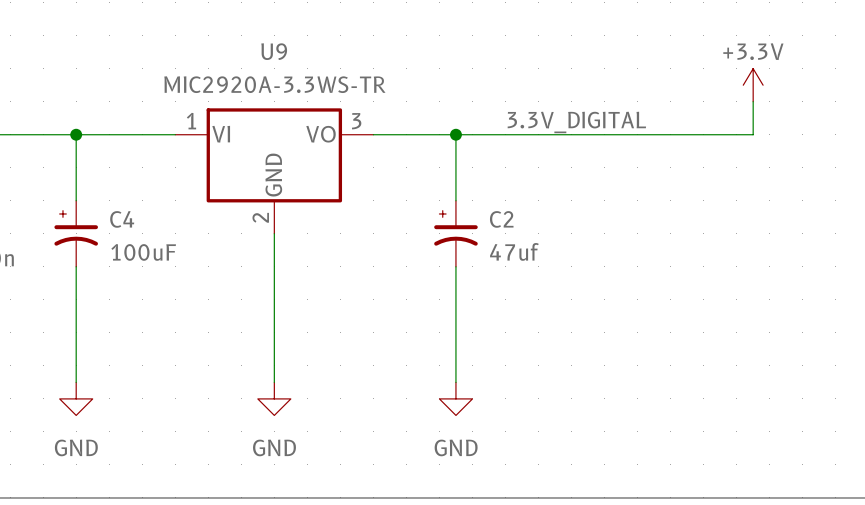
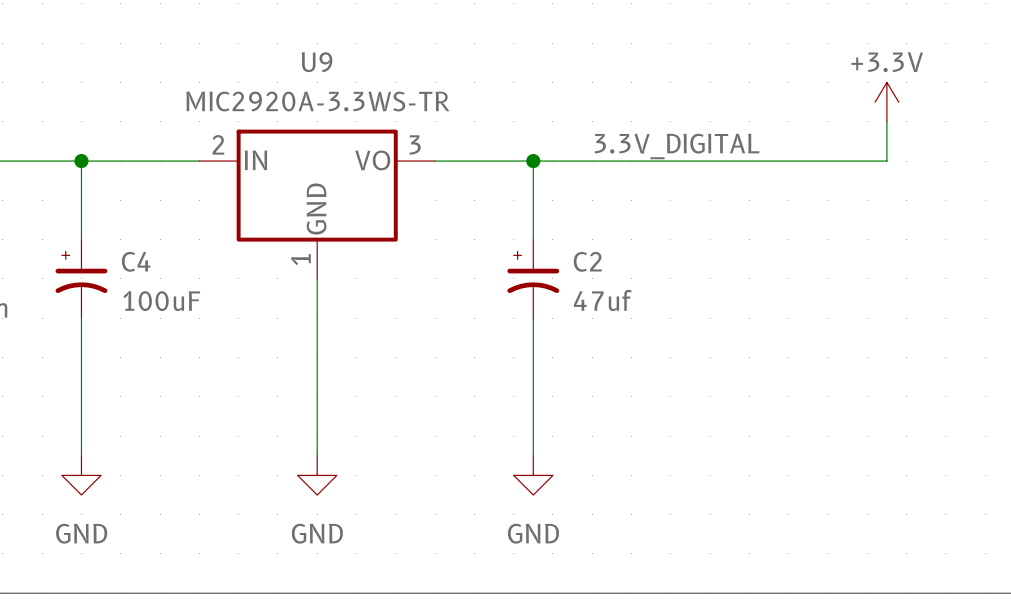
U9 pin number: 1 (191, 121) -> 2 (218, 144)
U9 pin name: VI (221, 134) -> IN (255, 160)
U9 pin number: 2 (260, 217) -> 1 (300, 259)

